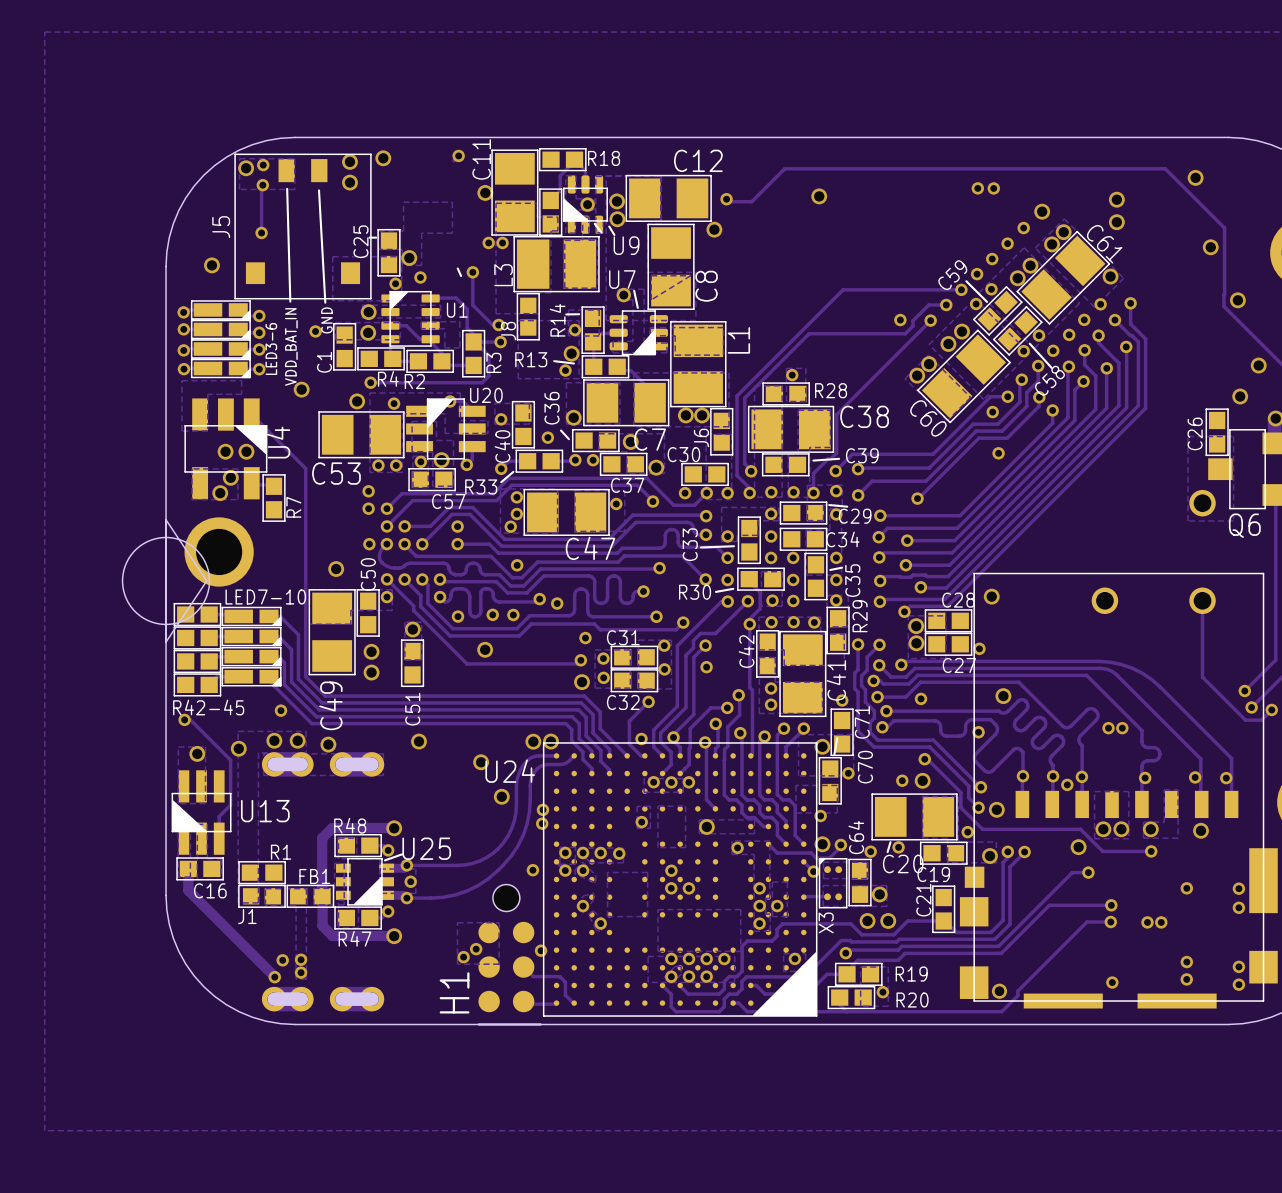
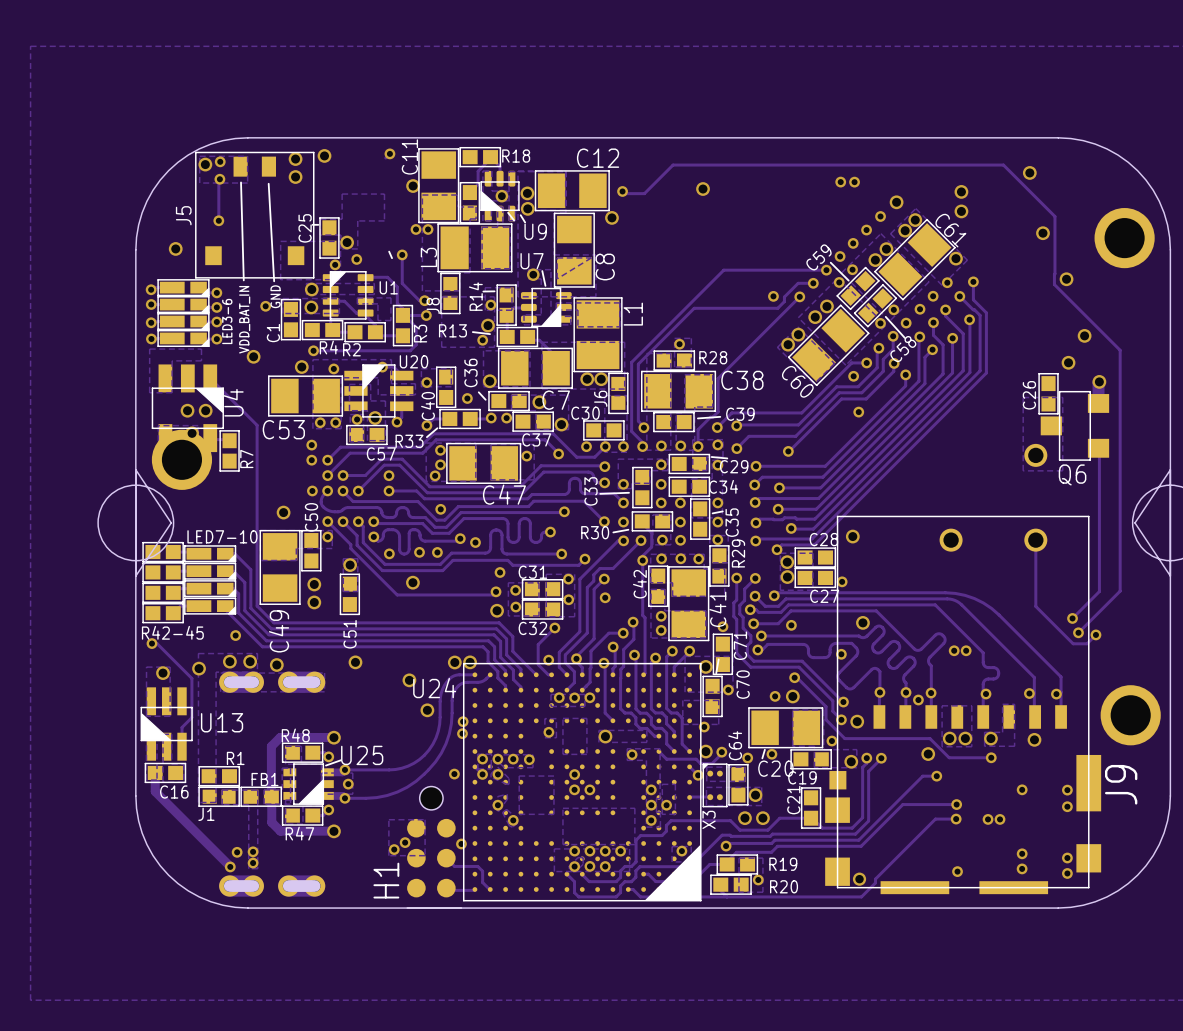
part position: (219, 551) -> (181, 459)

